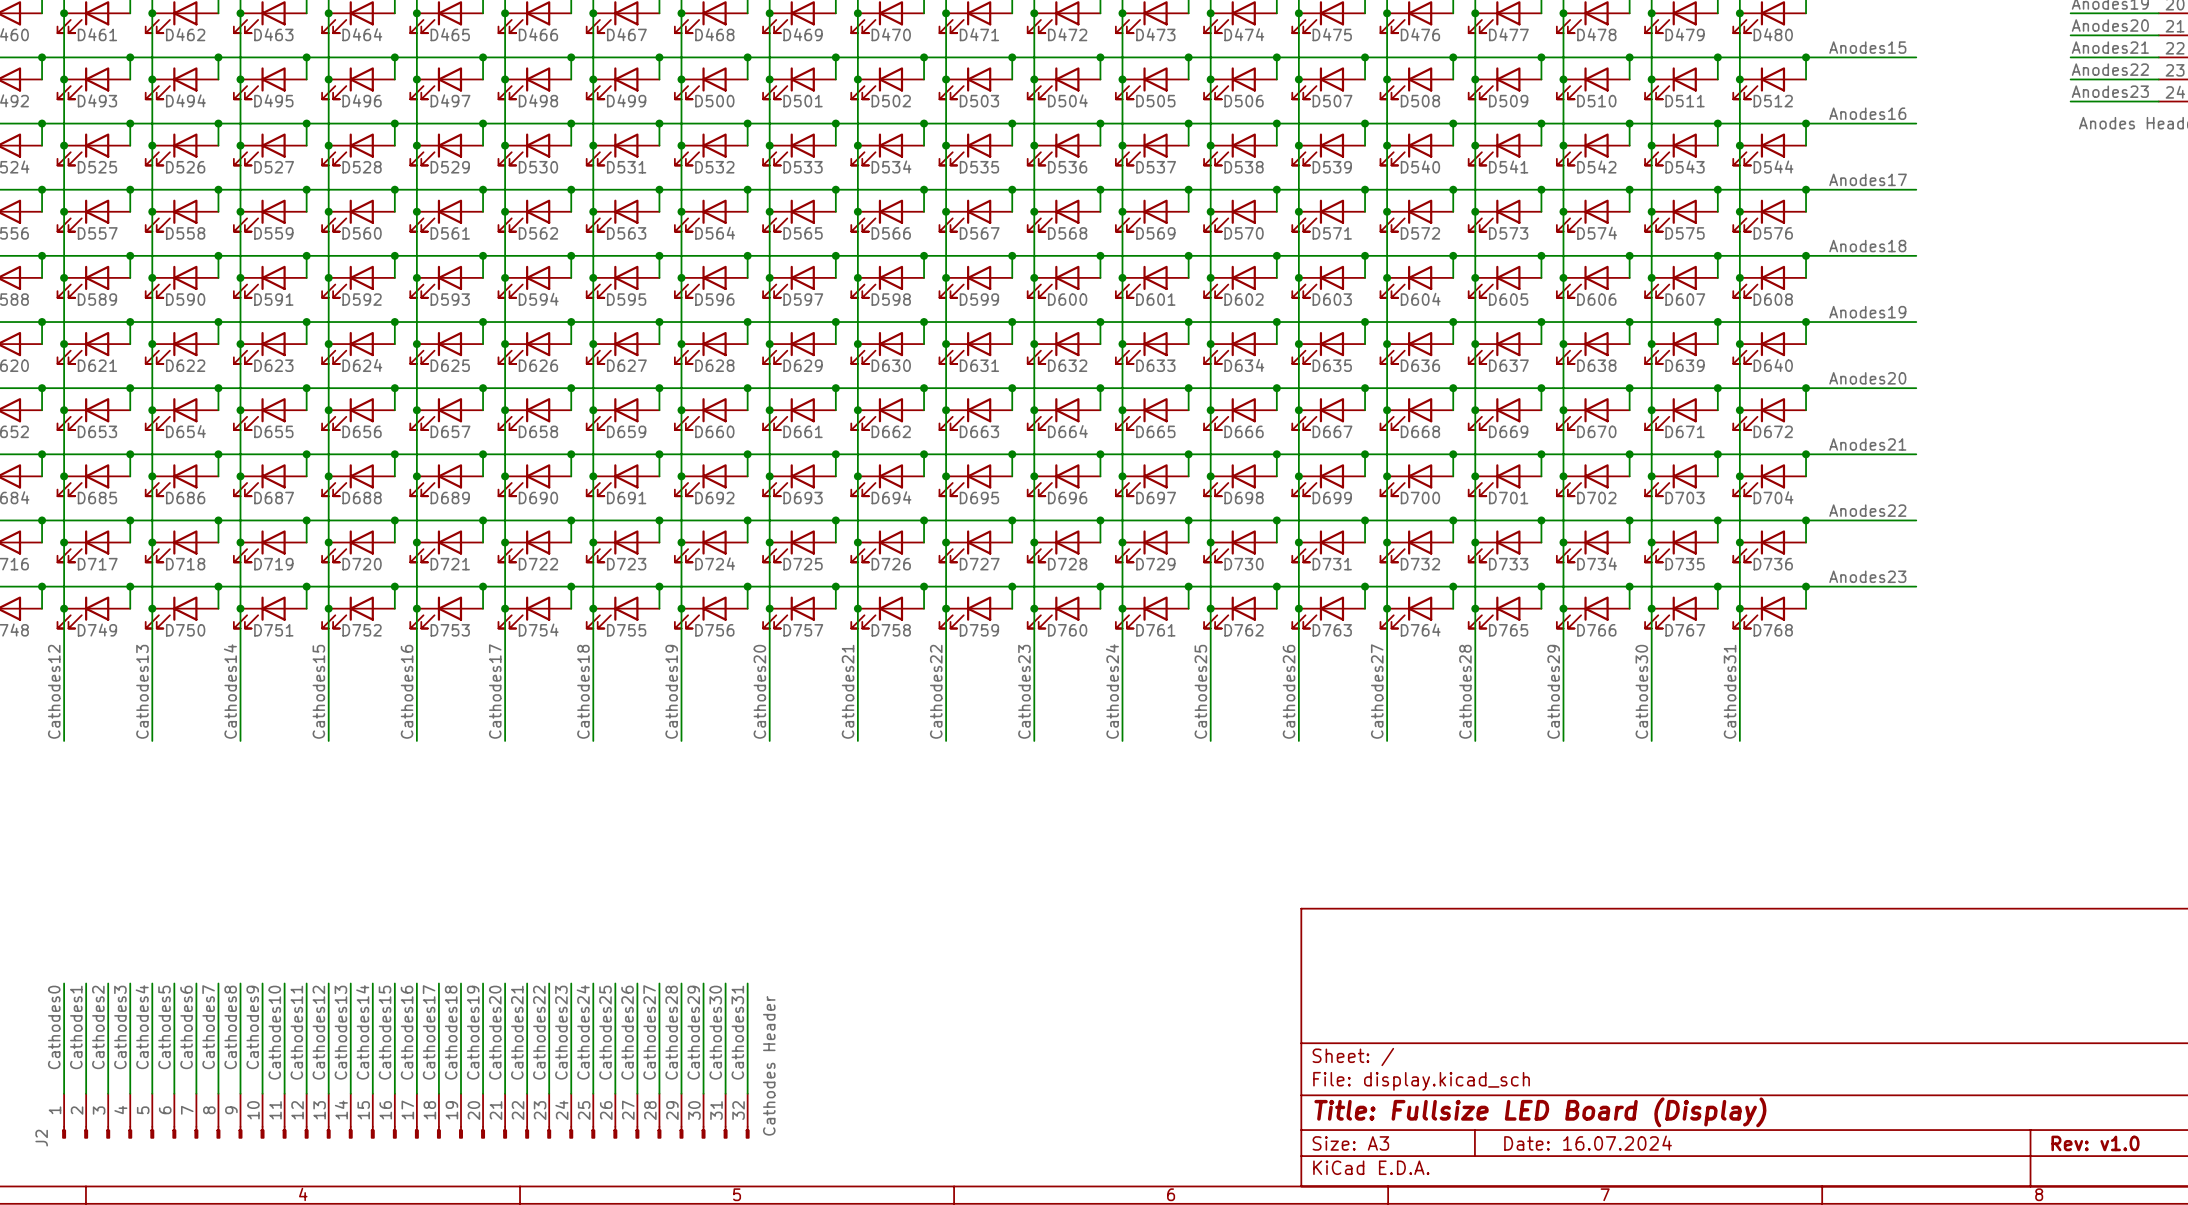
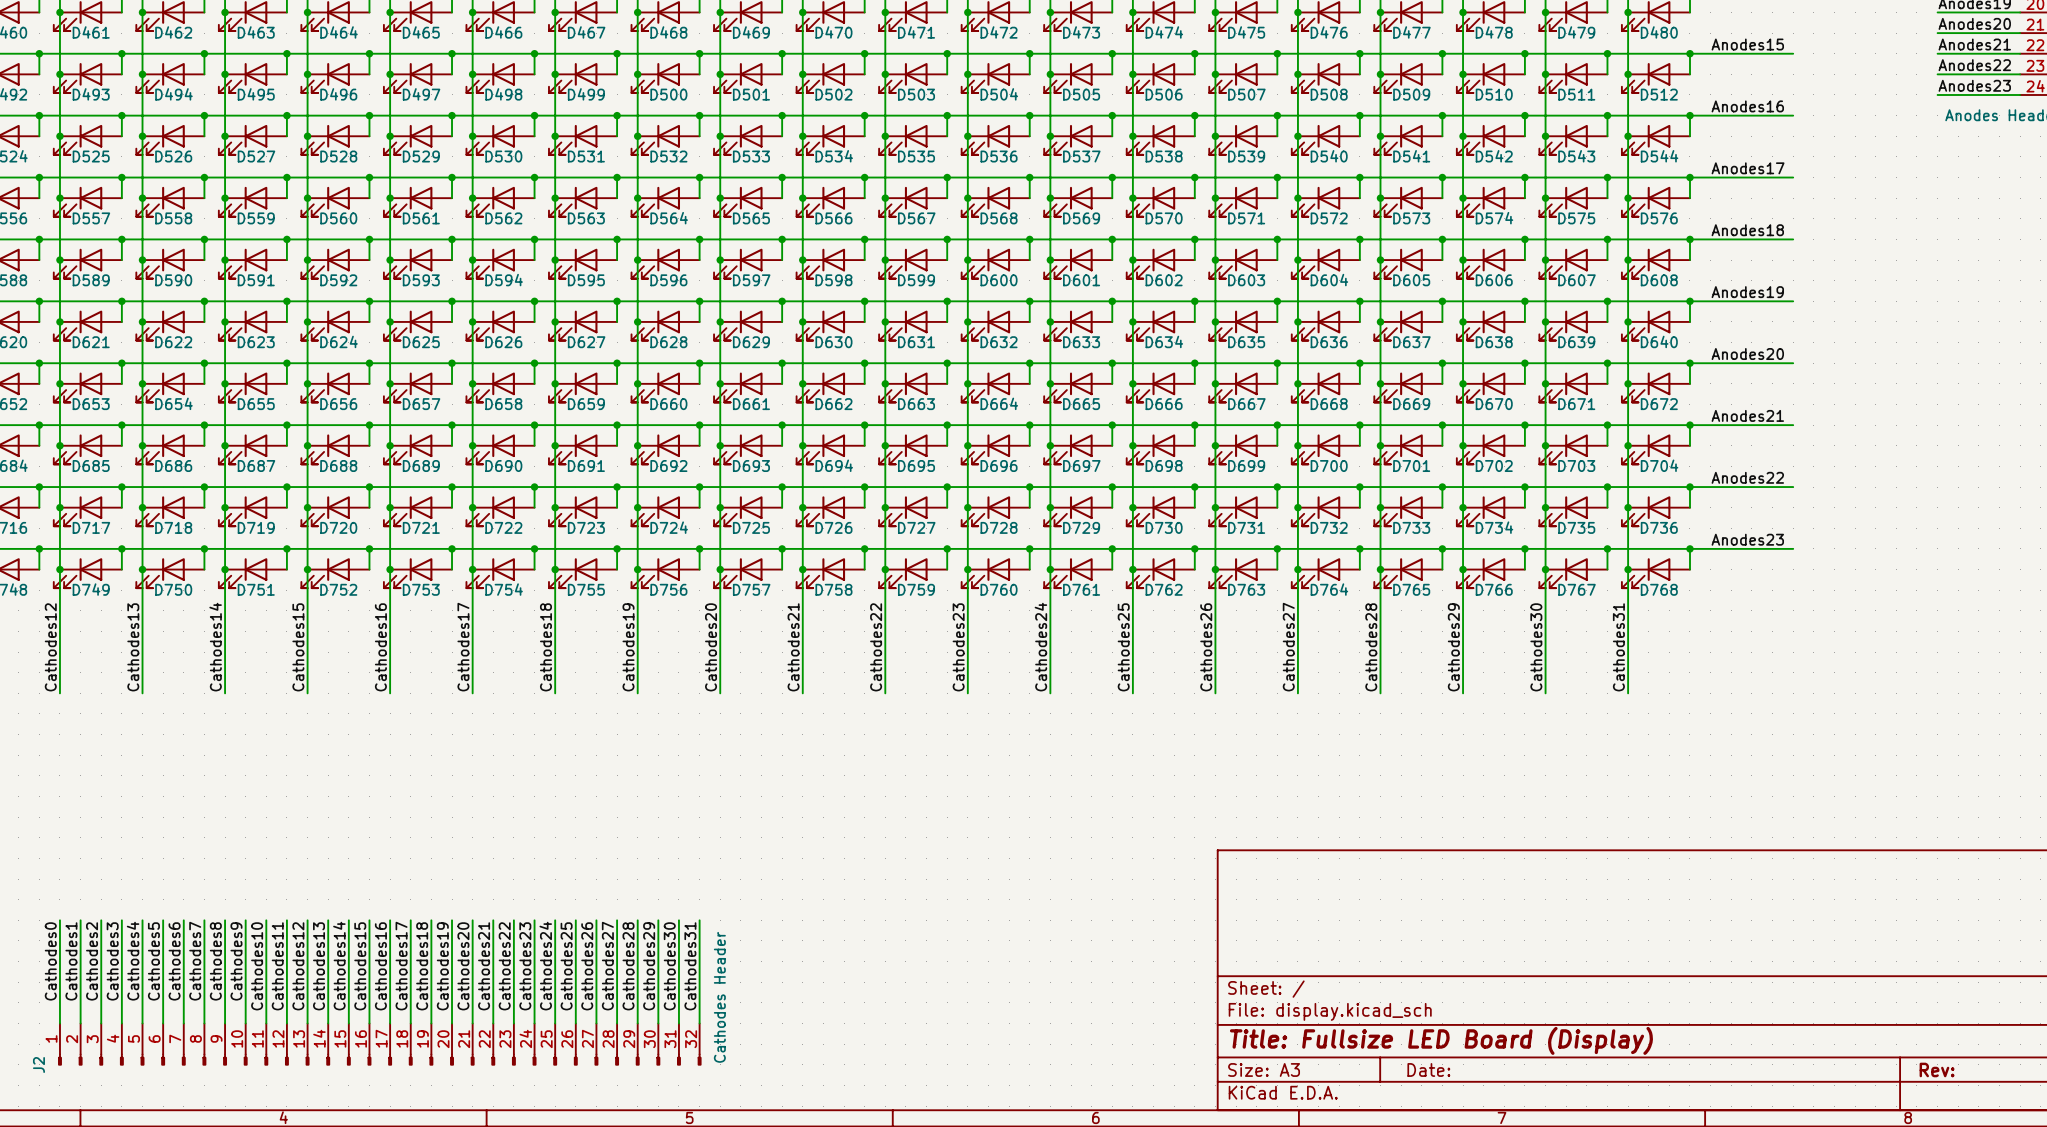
title block: Date: 16.07.2024 (1588, 1143) -> Date: (1428, 1069)
title block: Rev: v1.0 (2095, 1143) -> Rev: (1937, 1069)

